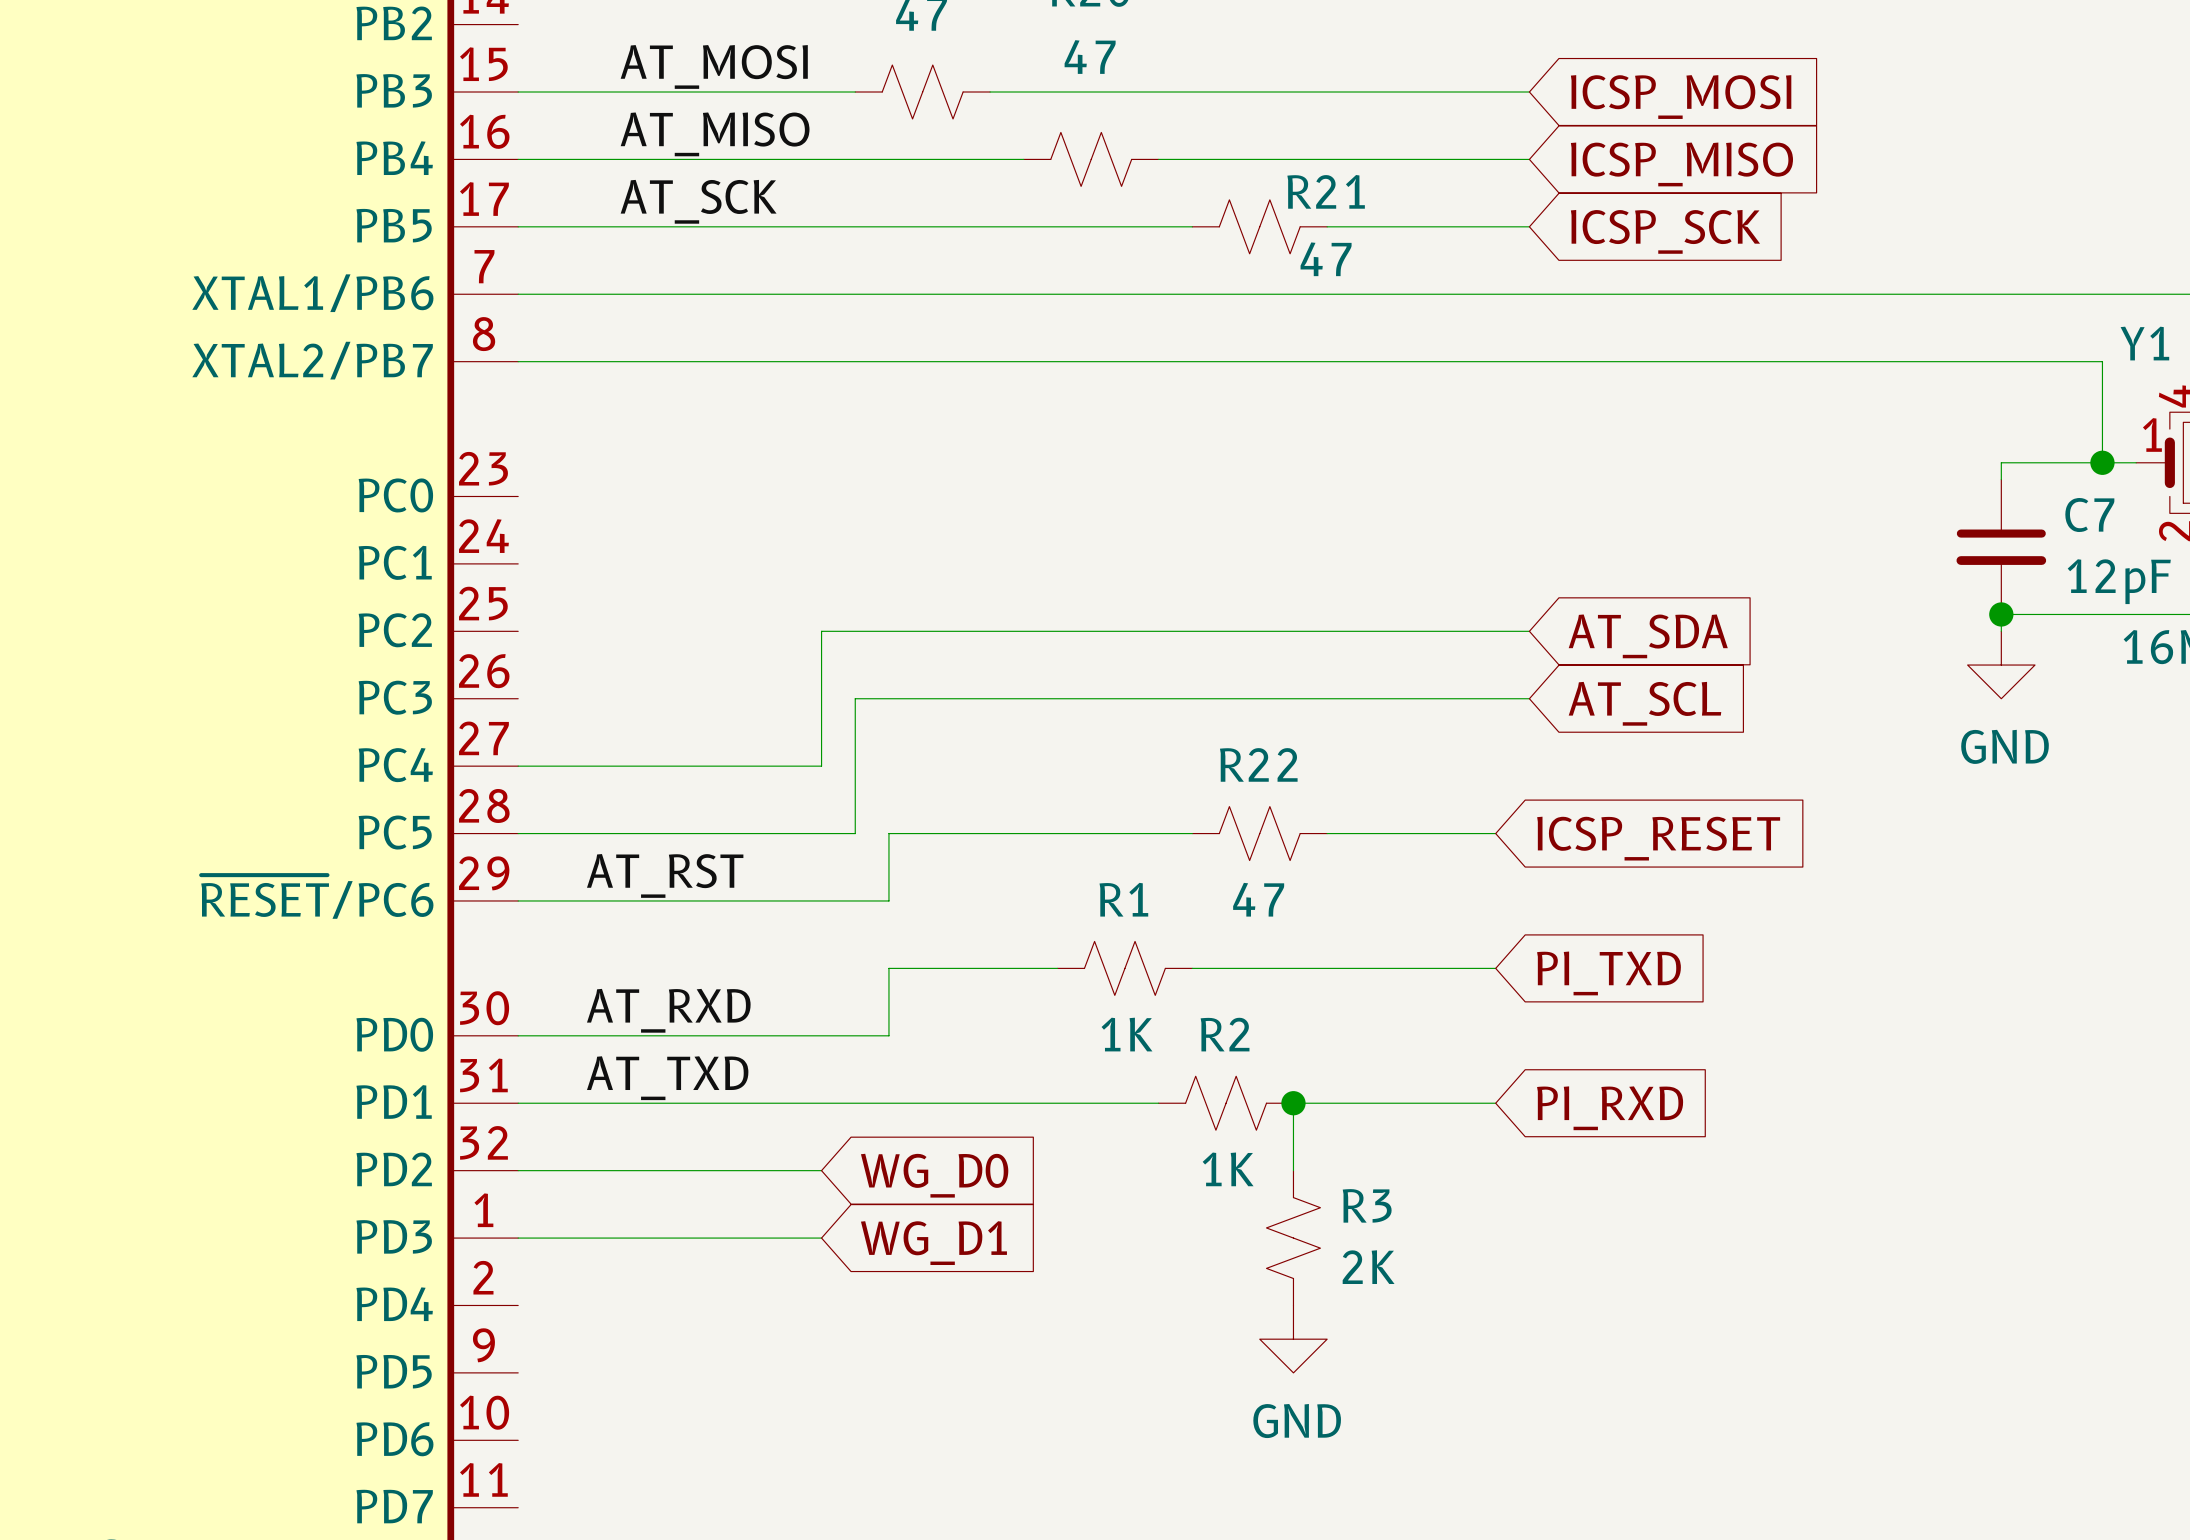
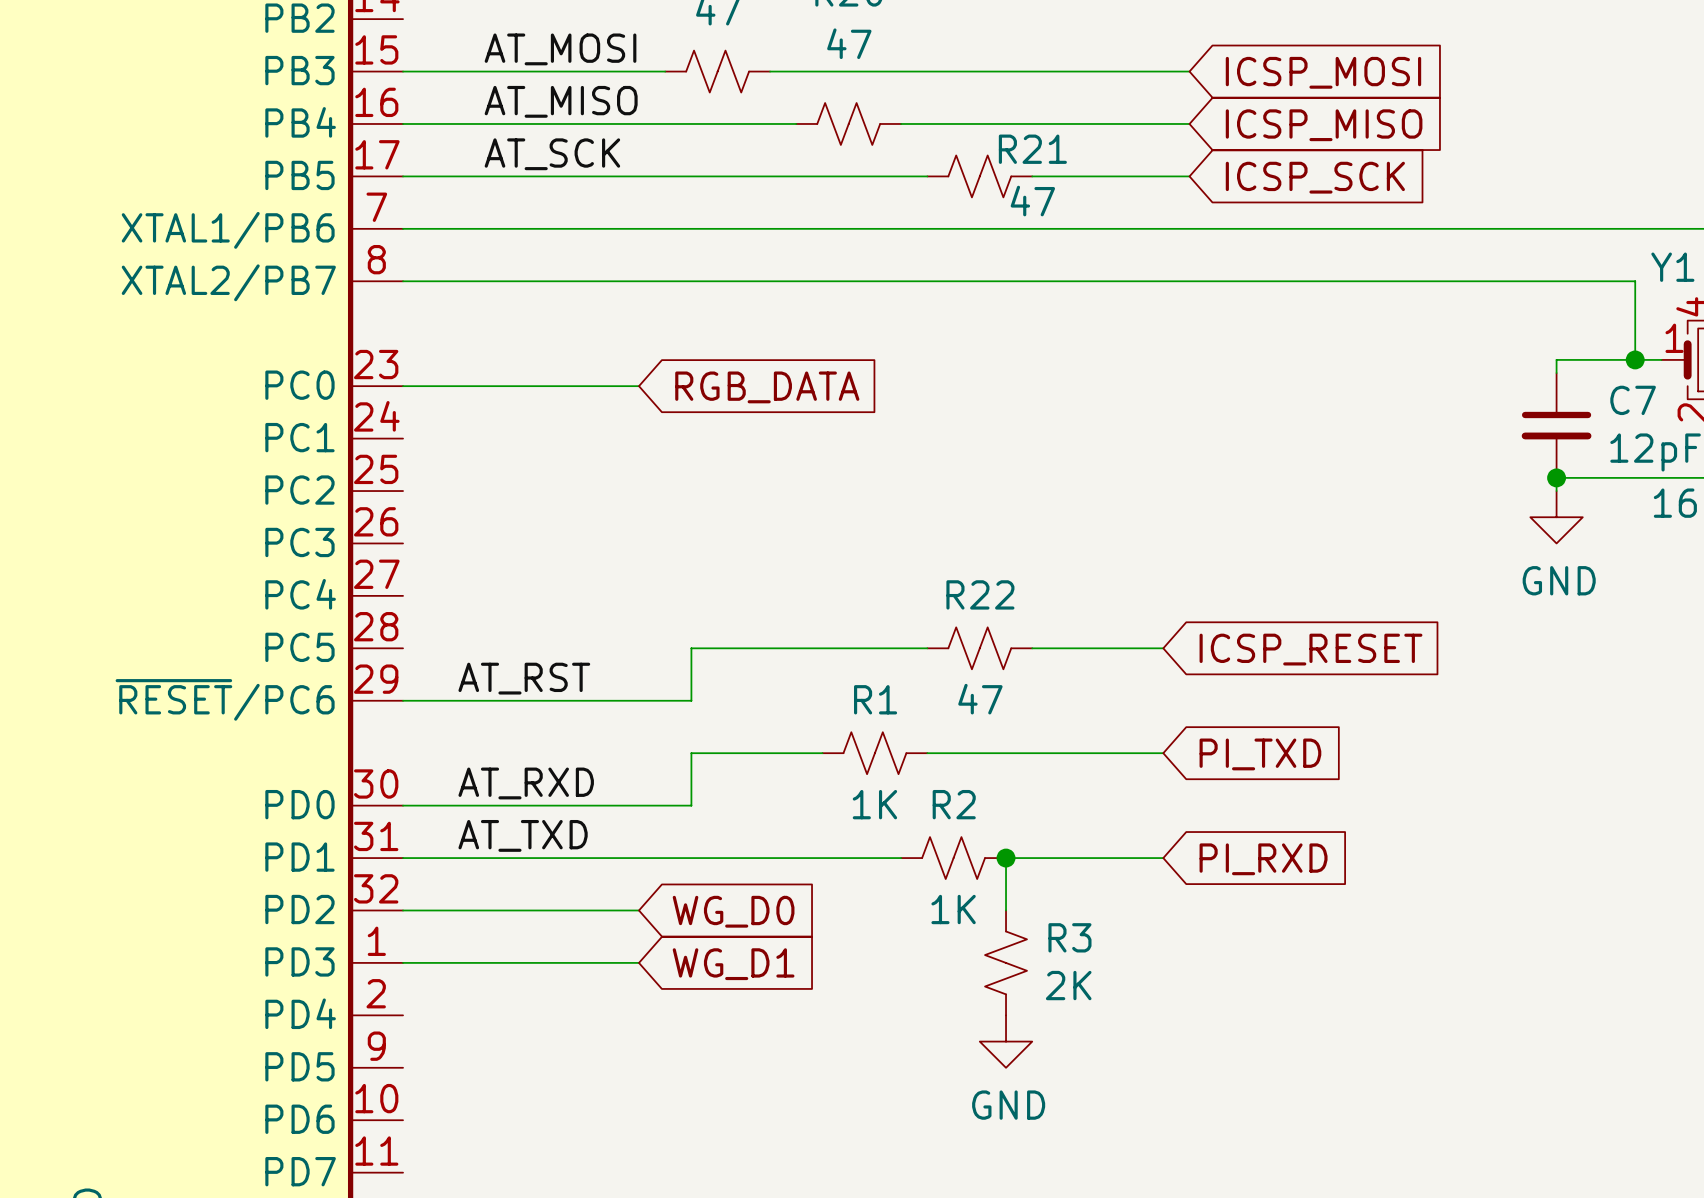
wire: none -> (403, 386) (638, 386)
global label: none -> RGB_DATA (767, 387)
wire: (1529, 631) (821, 631) (821, 766) (518, 766) -> none
global label: AT_SDA (1648, 636) -> none
wire: (1529, 698) (855, 698) (855, 833) (518, 833) -> none
global label: AT_SCL (1644, 703) -> none

